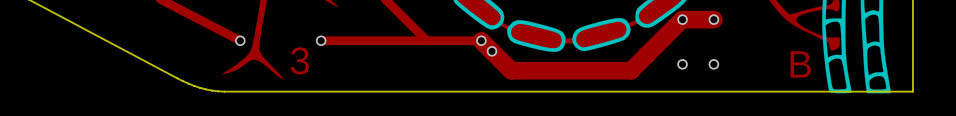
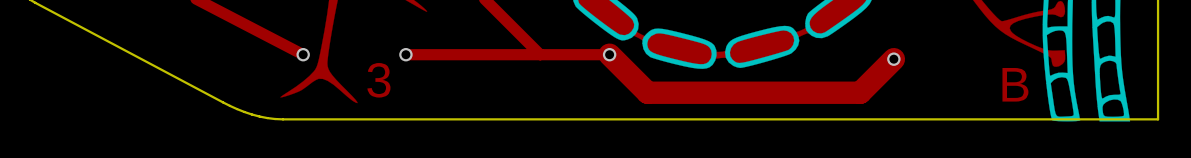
via: (682, 19) -> none
track: (713, 19) (682, 19) (631, 70) -> (893, 59) (860, 92) (799, 92)
via: (713, 19) -> none
via: none -> (893, 59)
via: (491, 51) -> none
via: (682, 64) -> none
via: (713, 64) -> none

